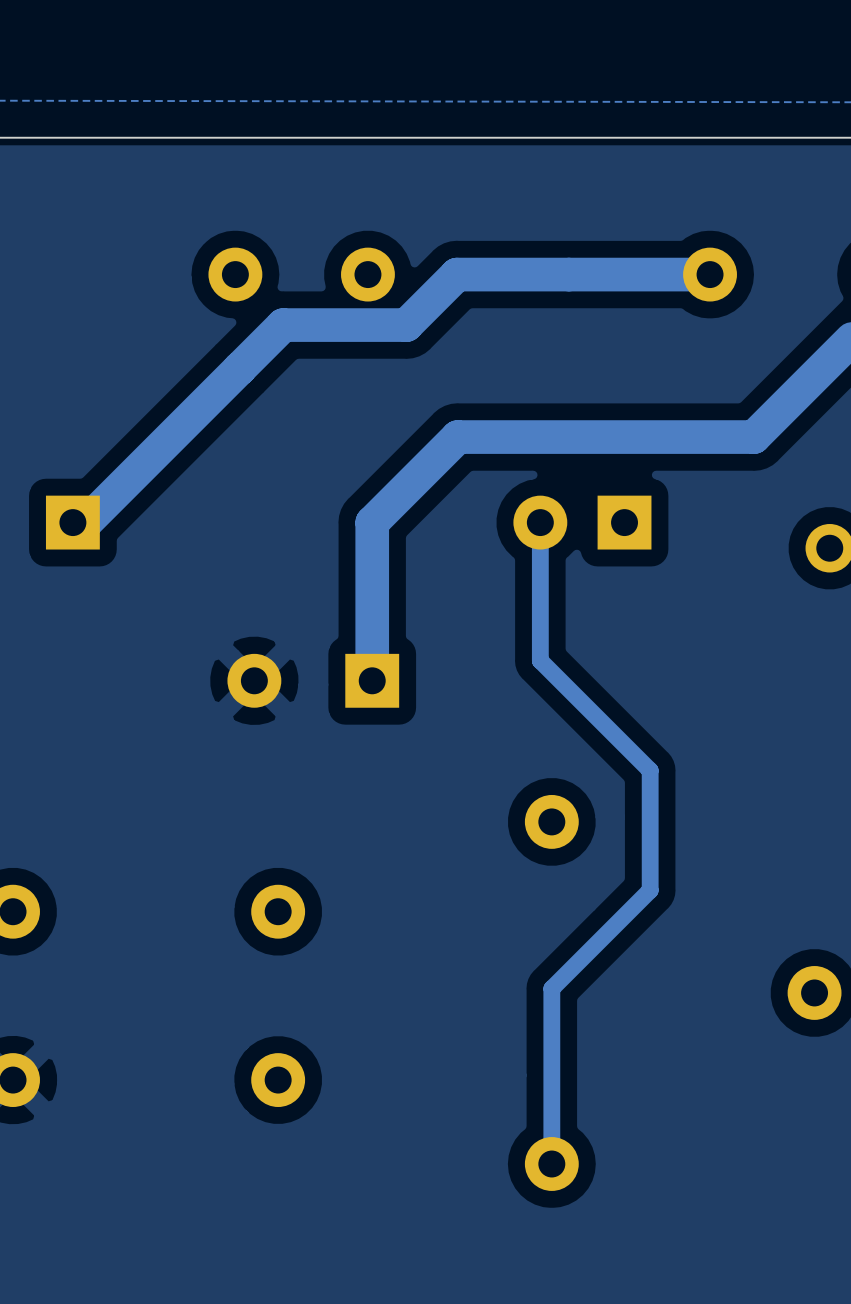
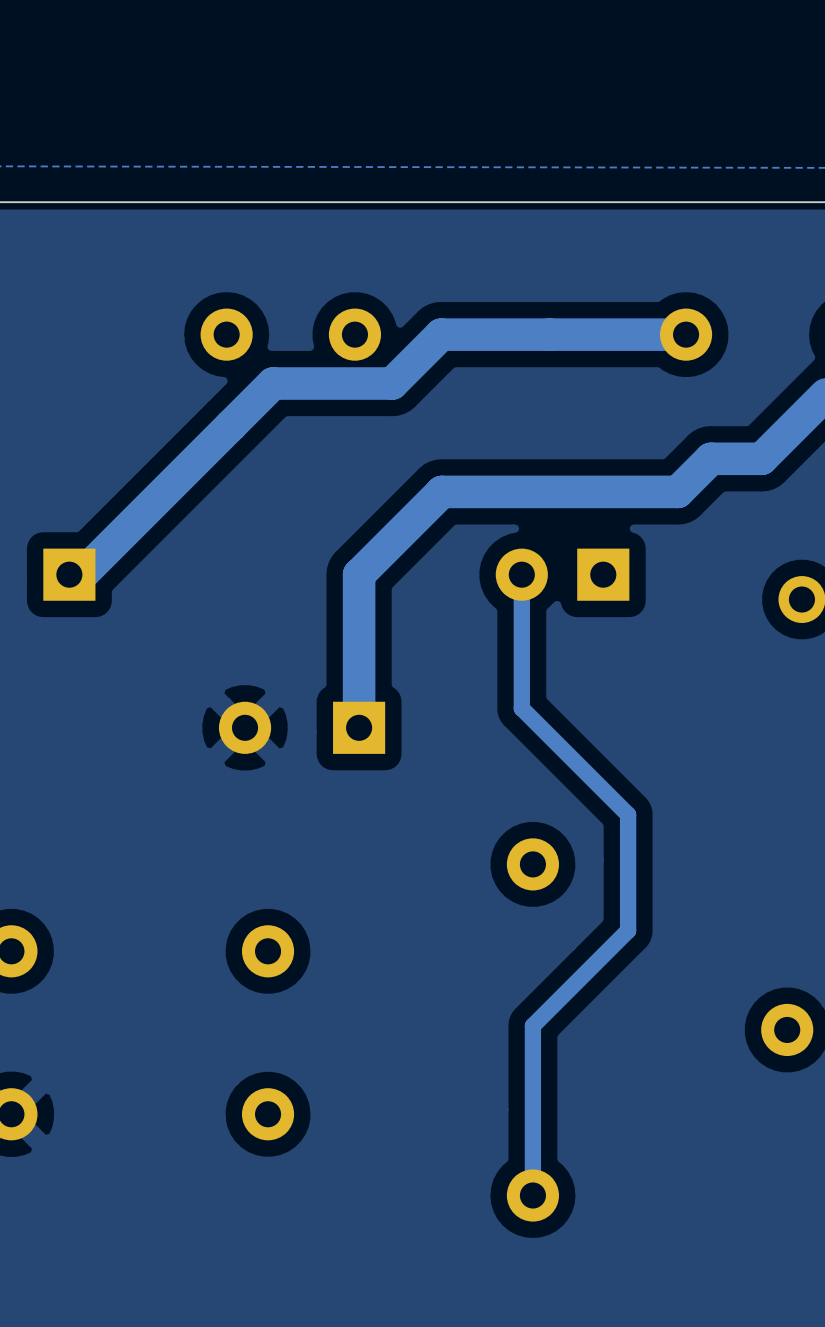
track: (788, 402) (753, 437) (701, 437) -> (761, 458) (710, 458) (677, 491)

